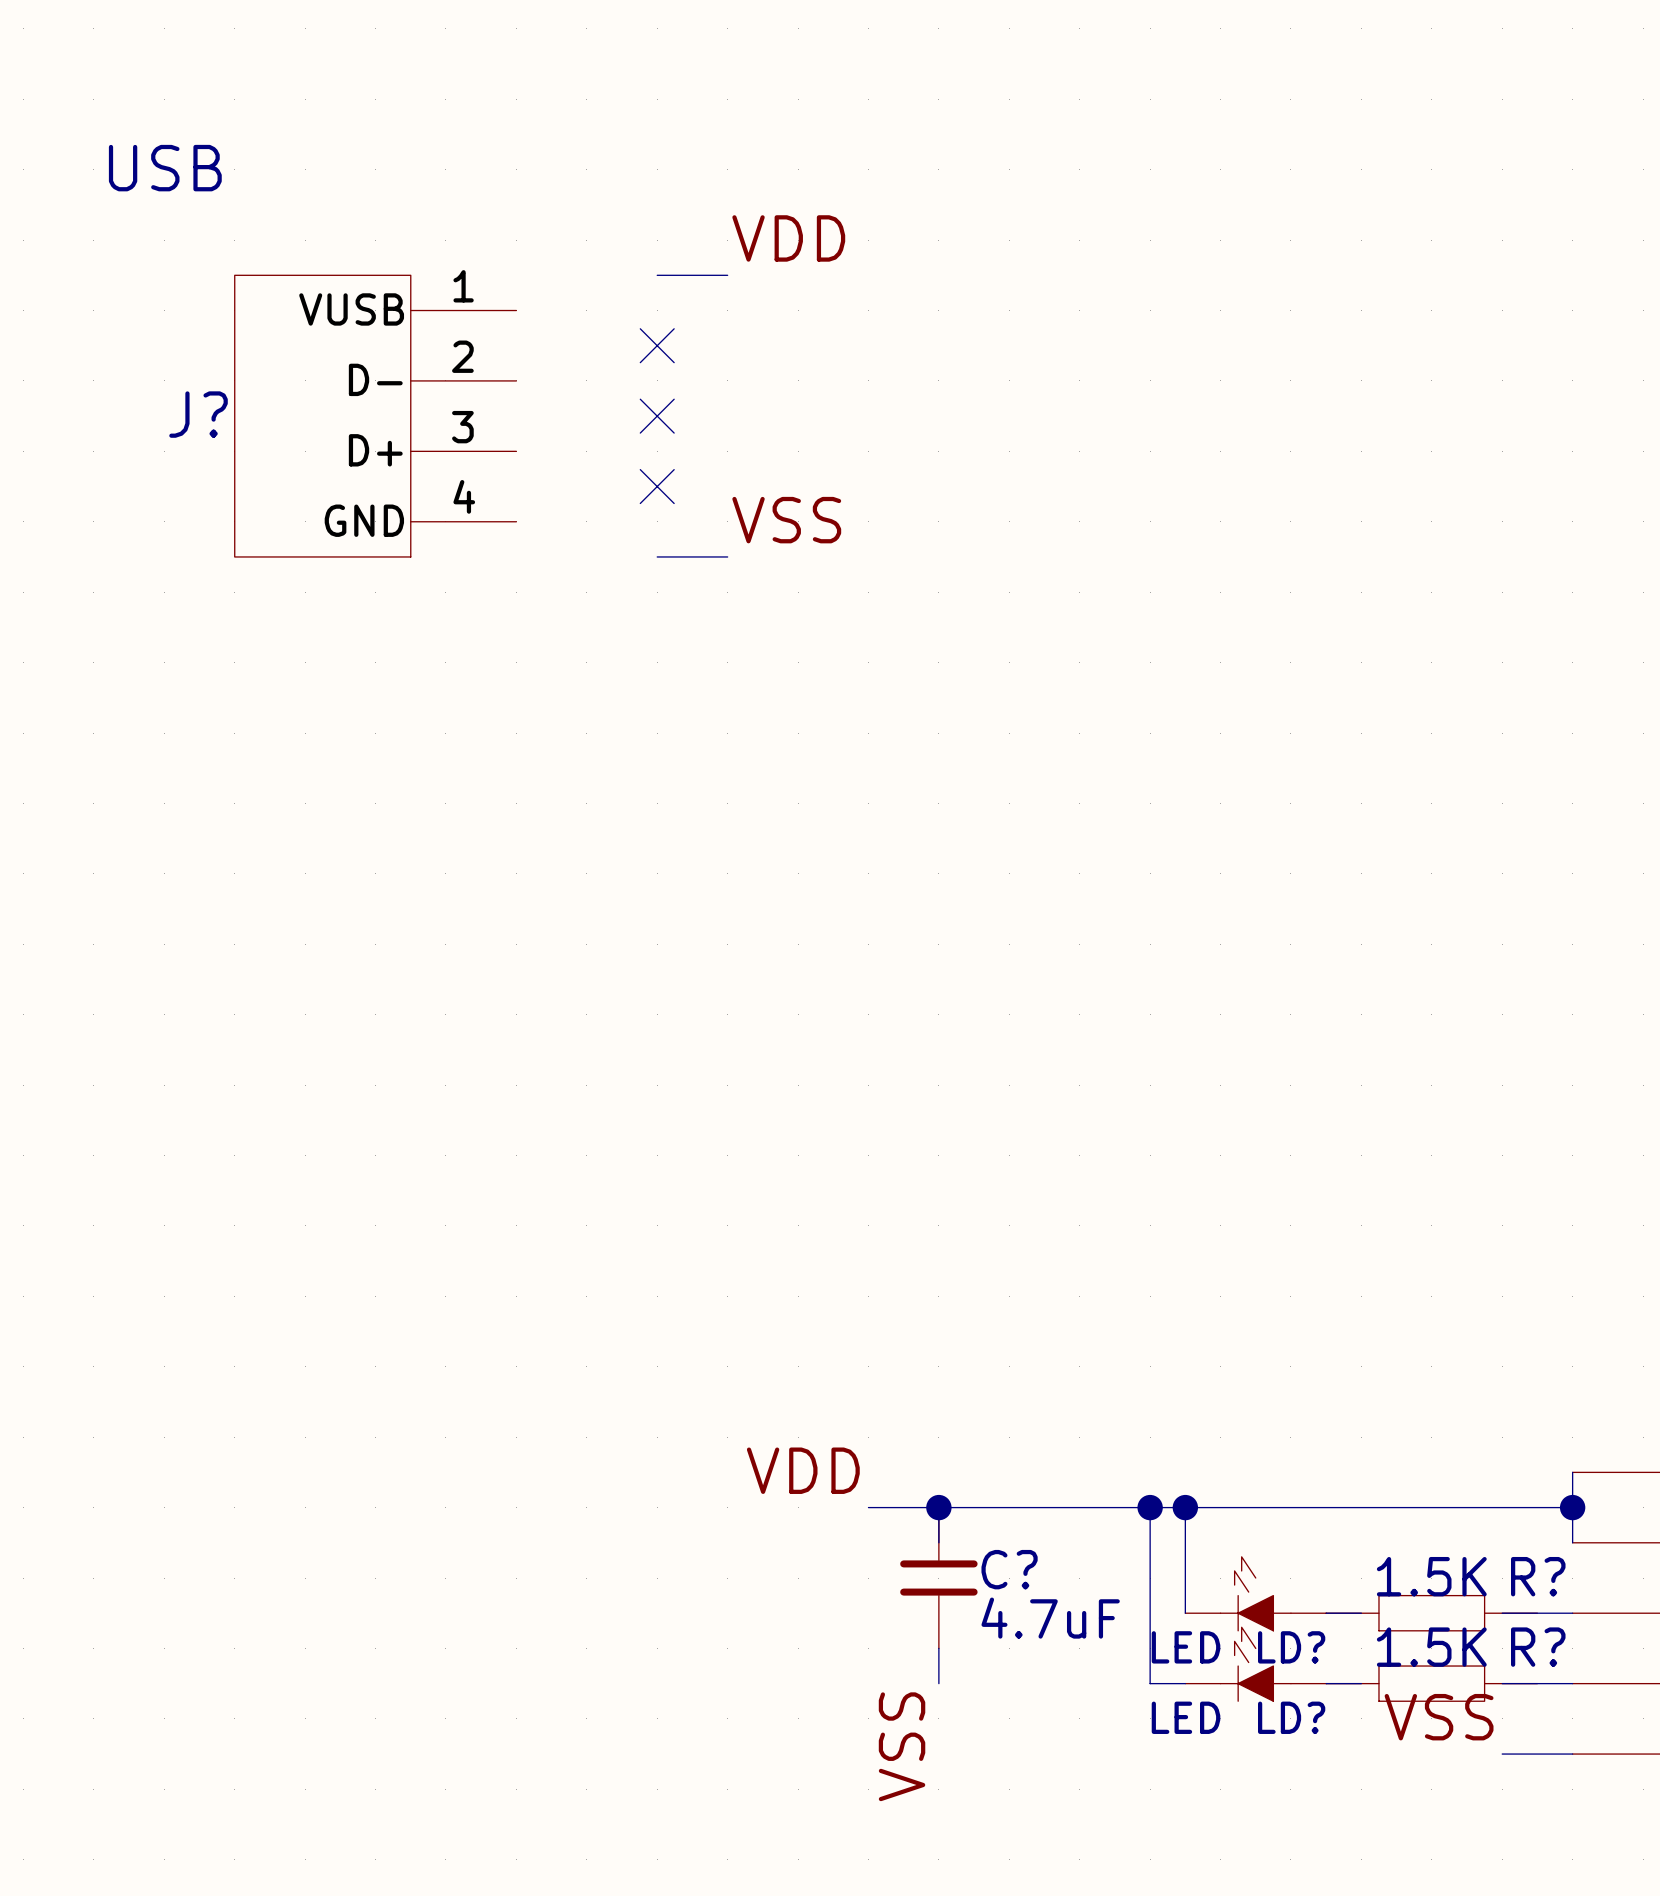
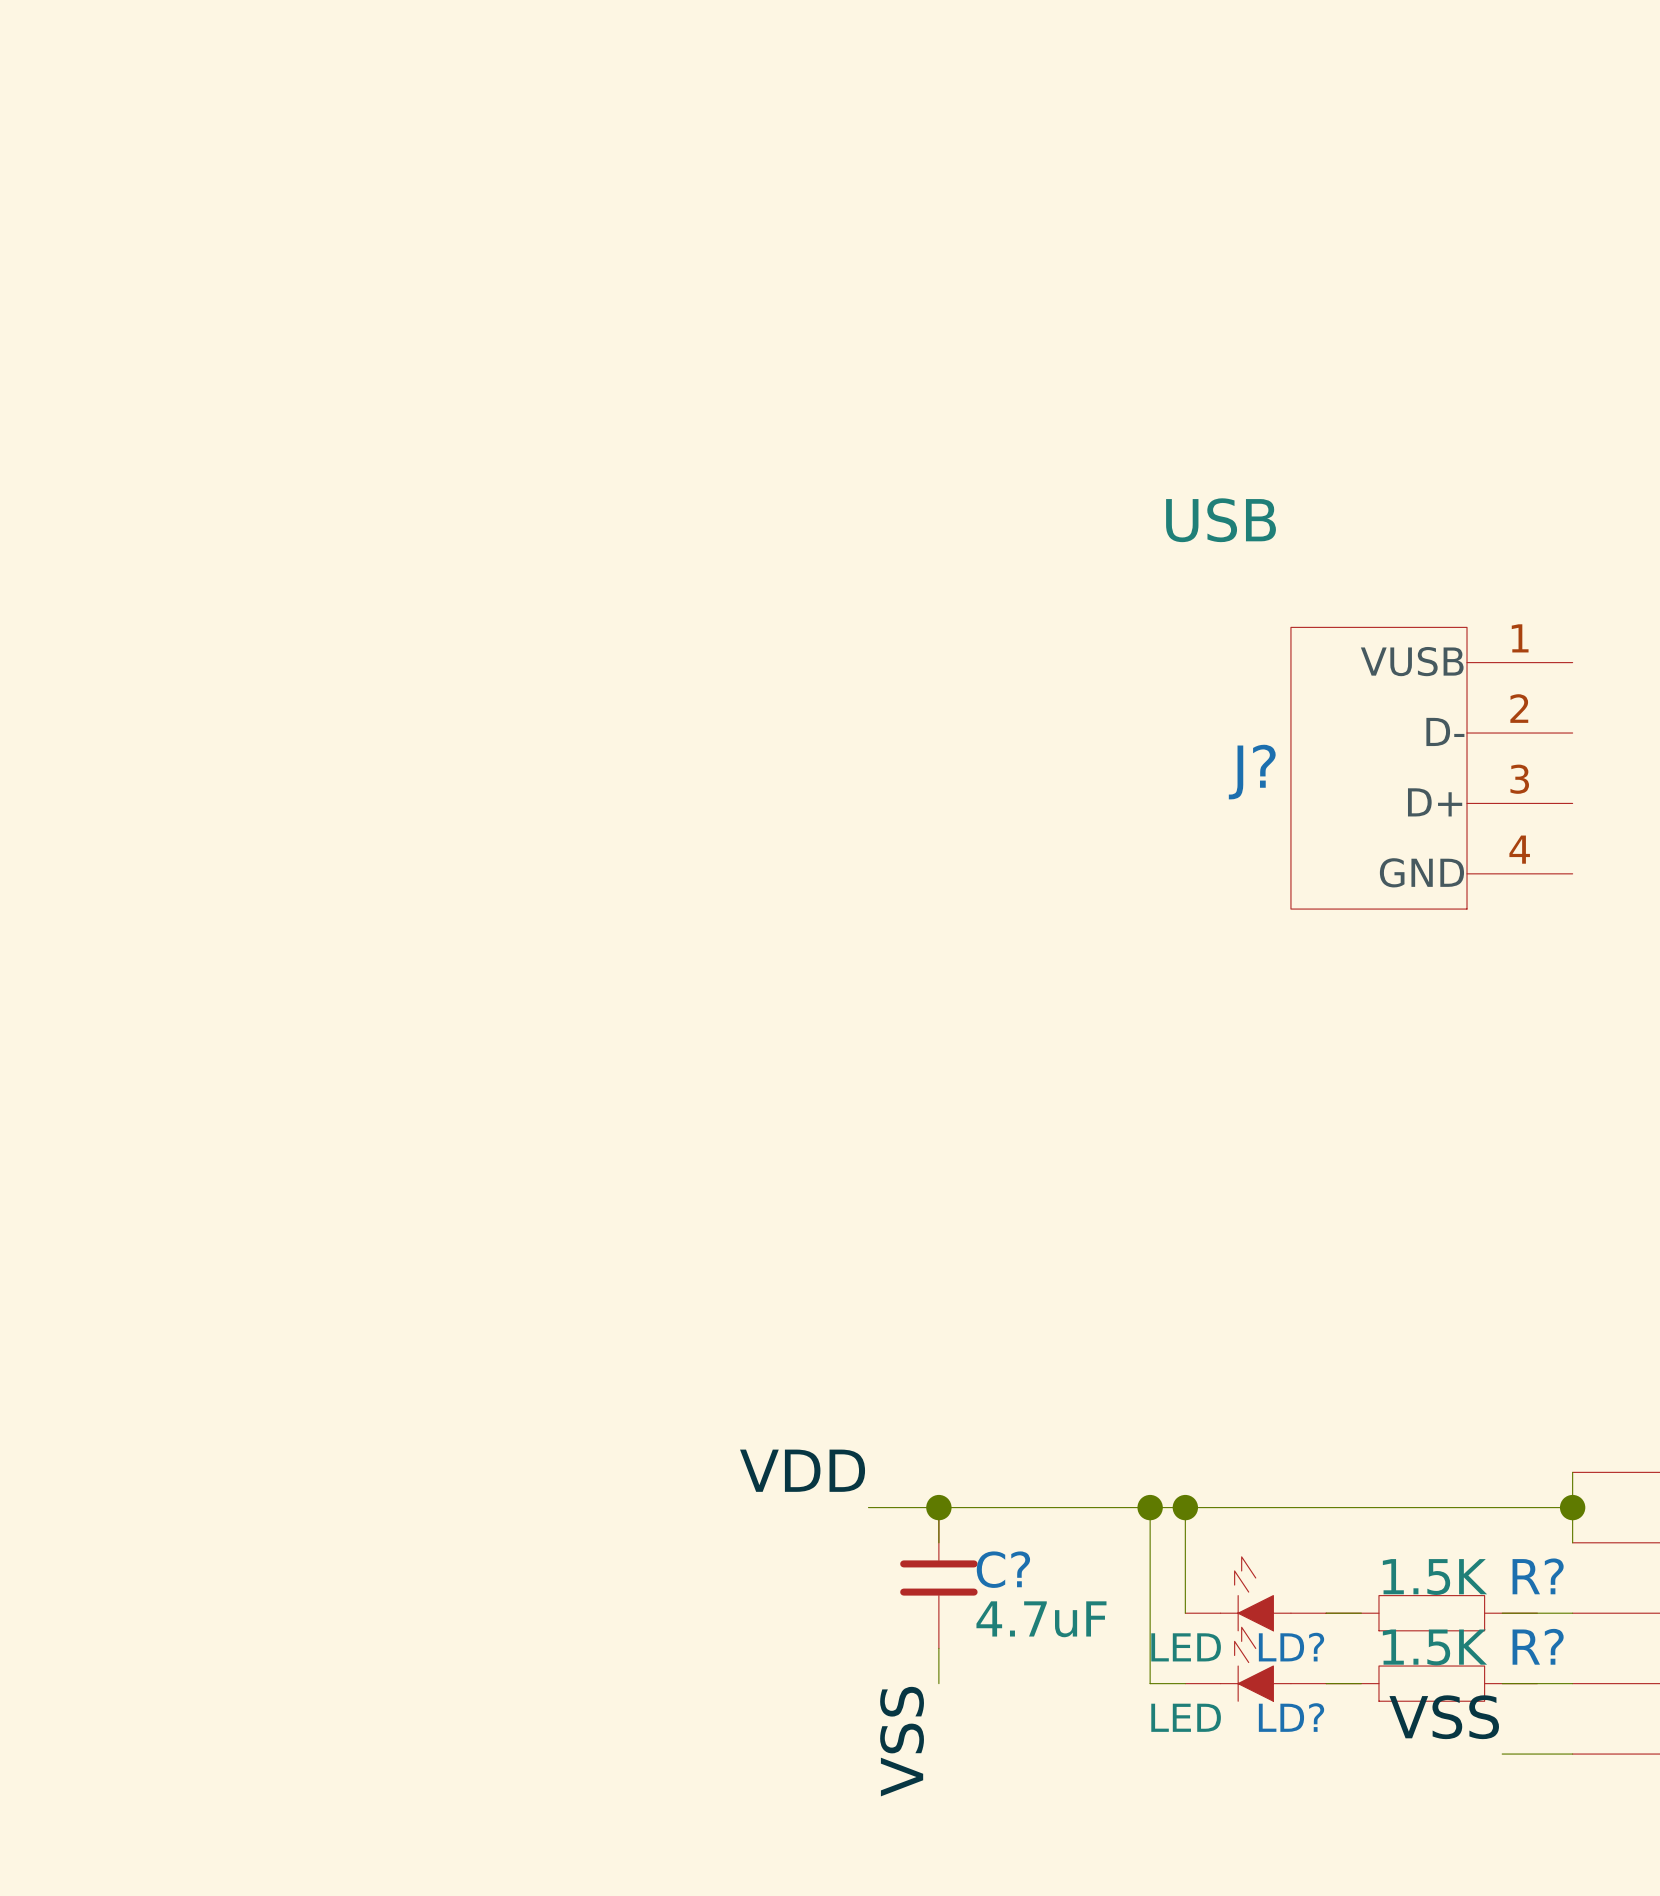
label: VDD (788, 238) -> none
wire: (657, 275) (727, 275) -> none
no-connect mark: (657, 345) -> none
J?: USB (375, 416) -> none
no-connect mark: (657, 416) -> none
no-connect mark: (657, 486) -> none
label: VSS (786, 520) -> none
wire: (657, 556) (727, 556) -> none
J?: none -> USB (1431, 768)

